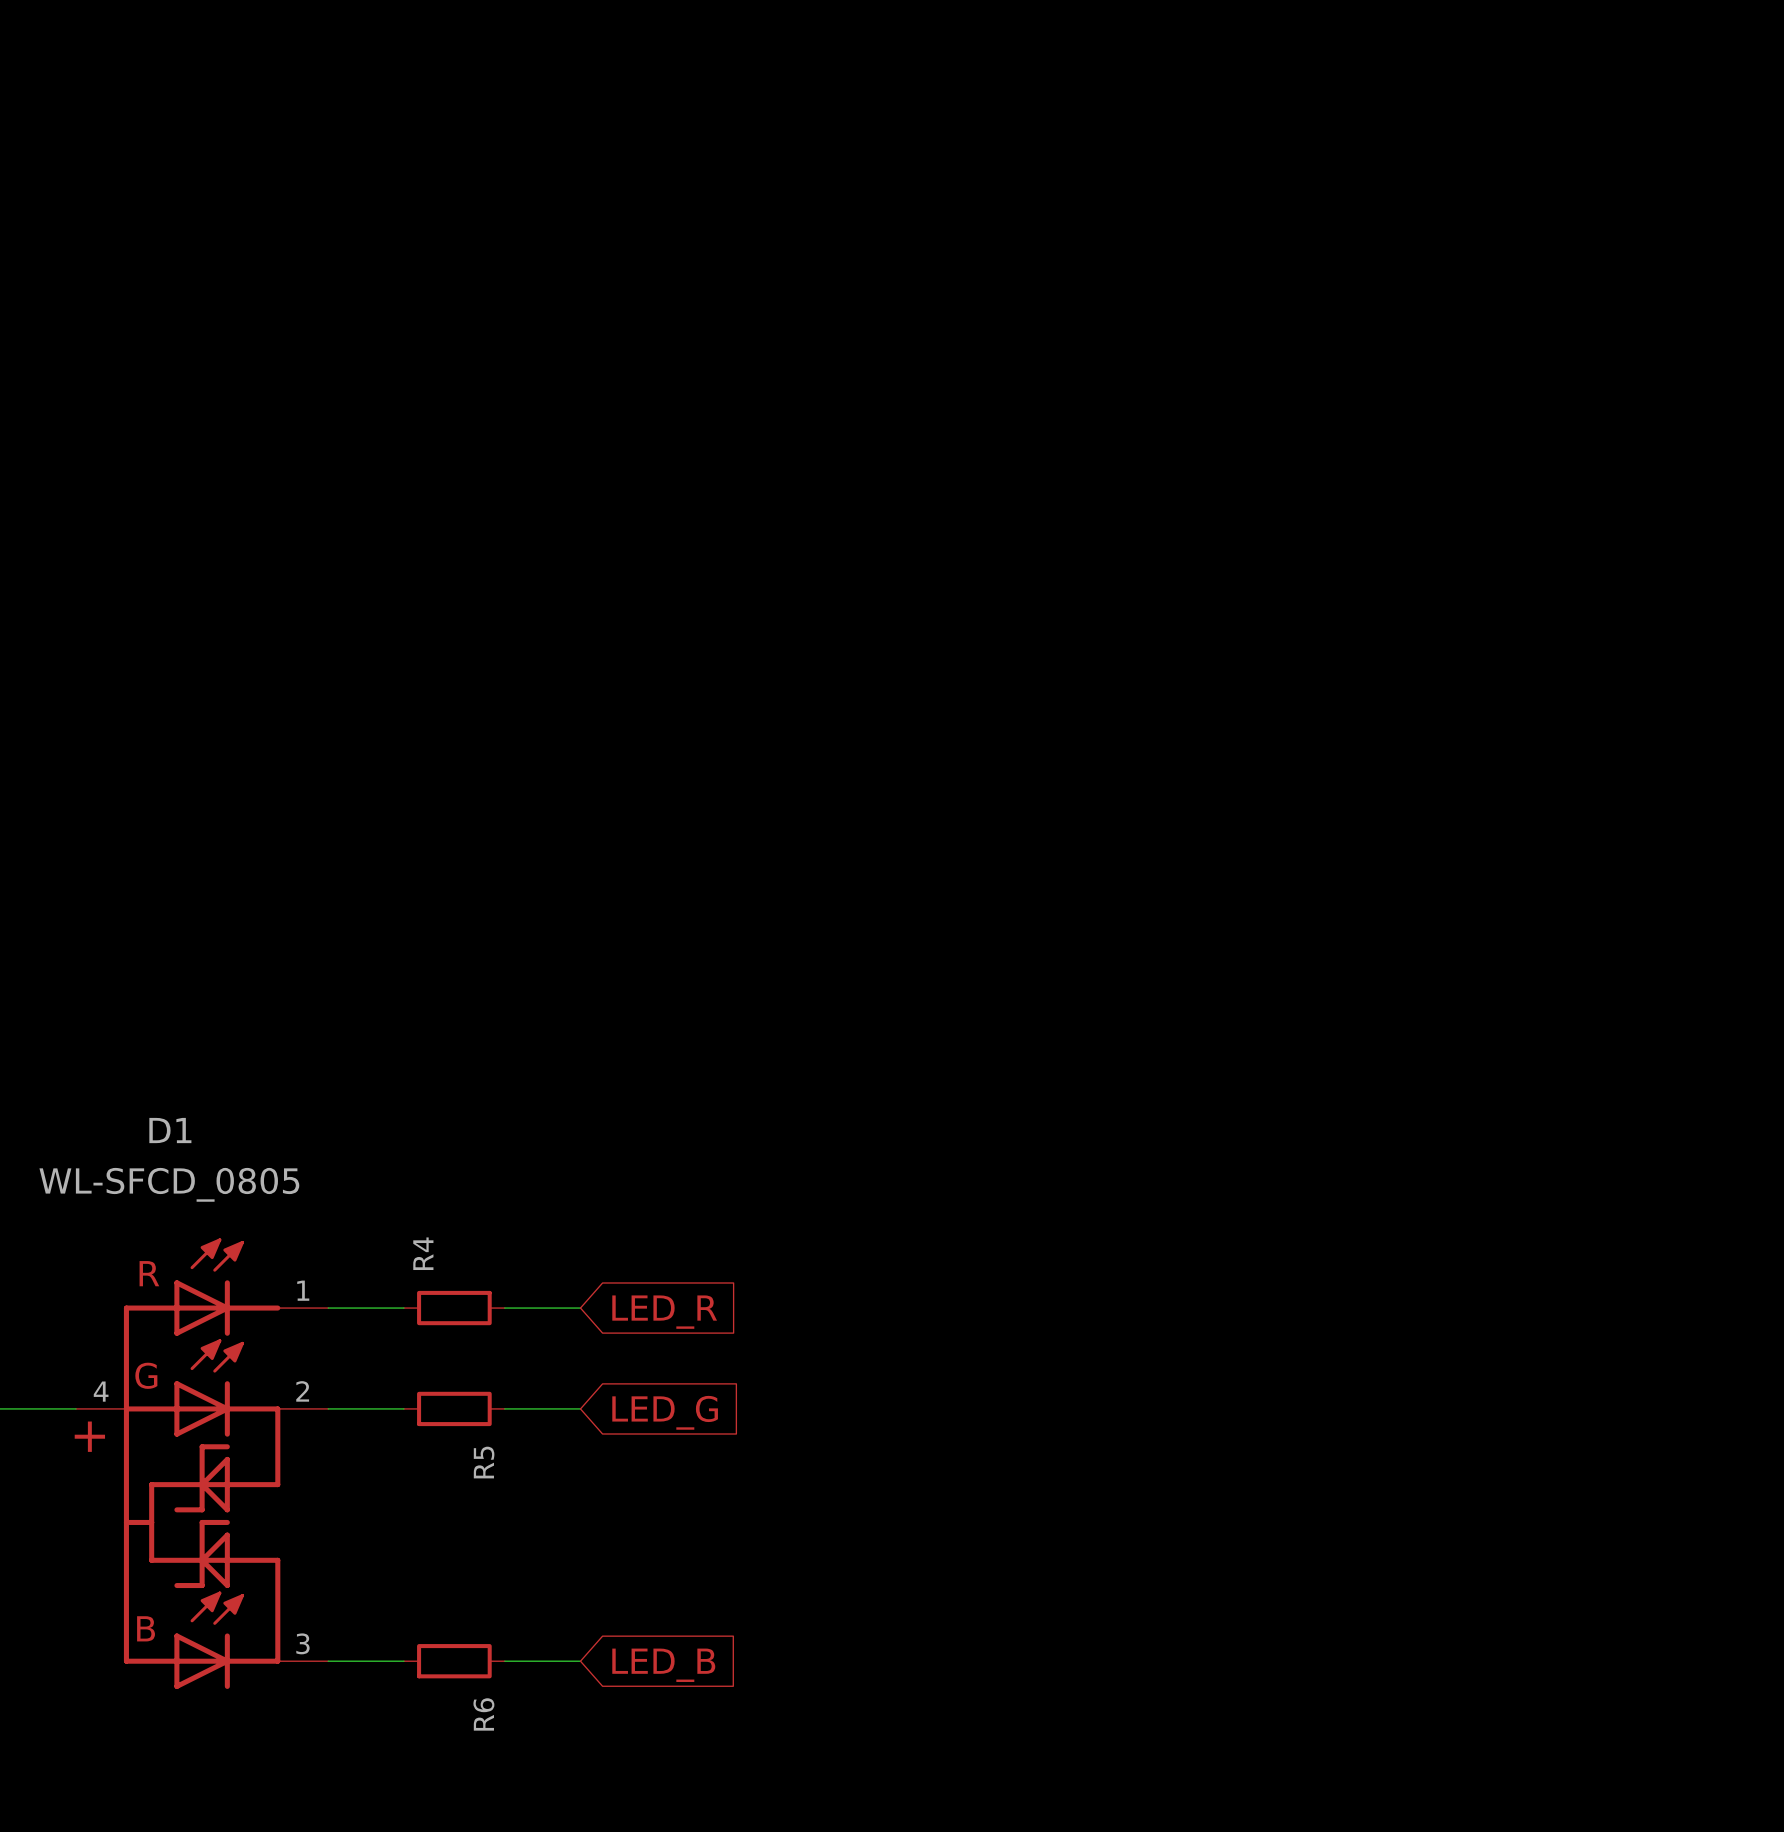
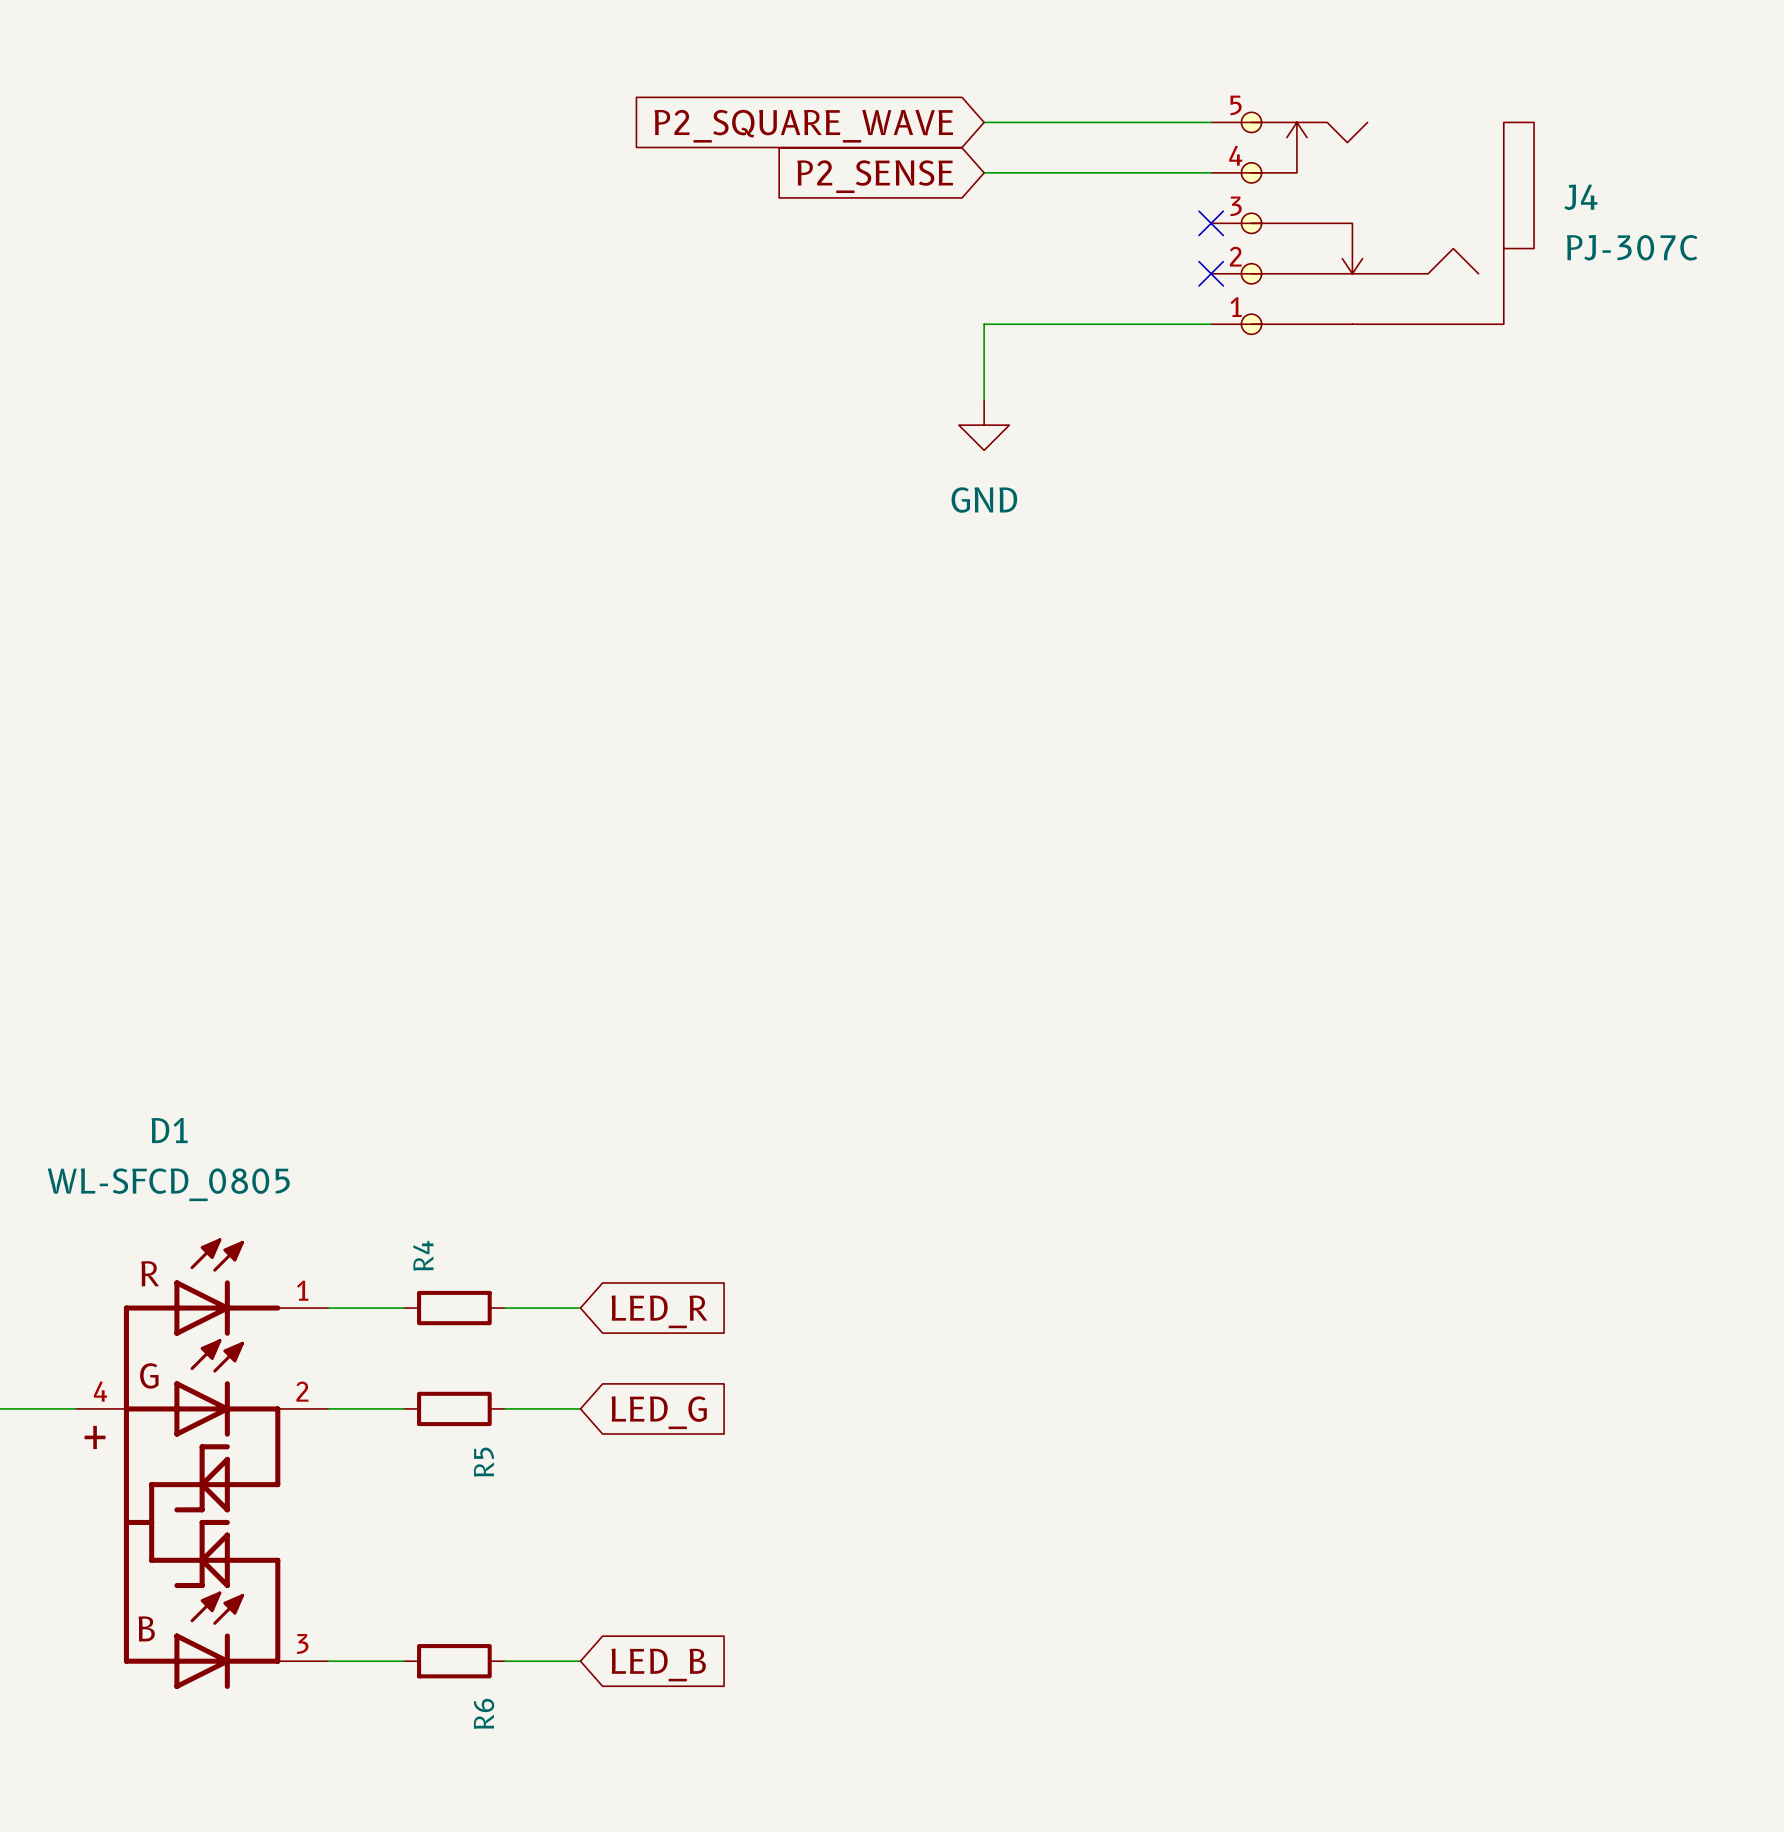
wire: none -> (984, 122) (1211, 122)
global label: none -> P2_SQUARE_WAVE (803, 126)
wire: none -> (984, 172) (1211, 172)
global label: none -> P2_SENSE (875, 176)
no-connect mark: none -> (1211, 223)
J4: none -> PJ-307C (1372, 223)
no-connect mark: none -> (1211, 273)
wire: none -> (1211, 324) (984, 324) (984, 399)
power symbol: none -> GND (984, 425)

